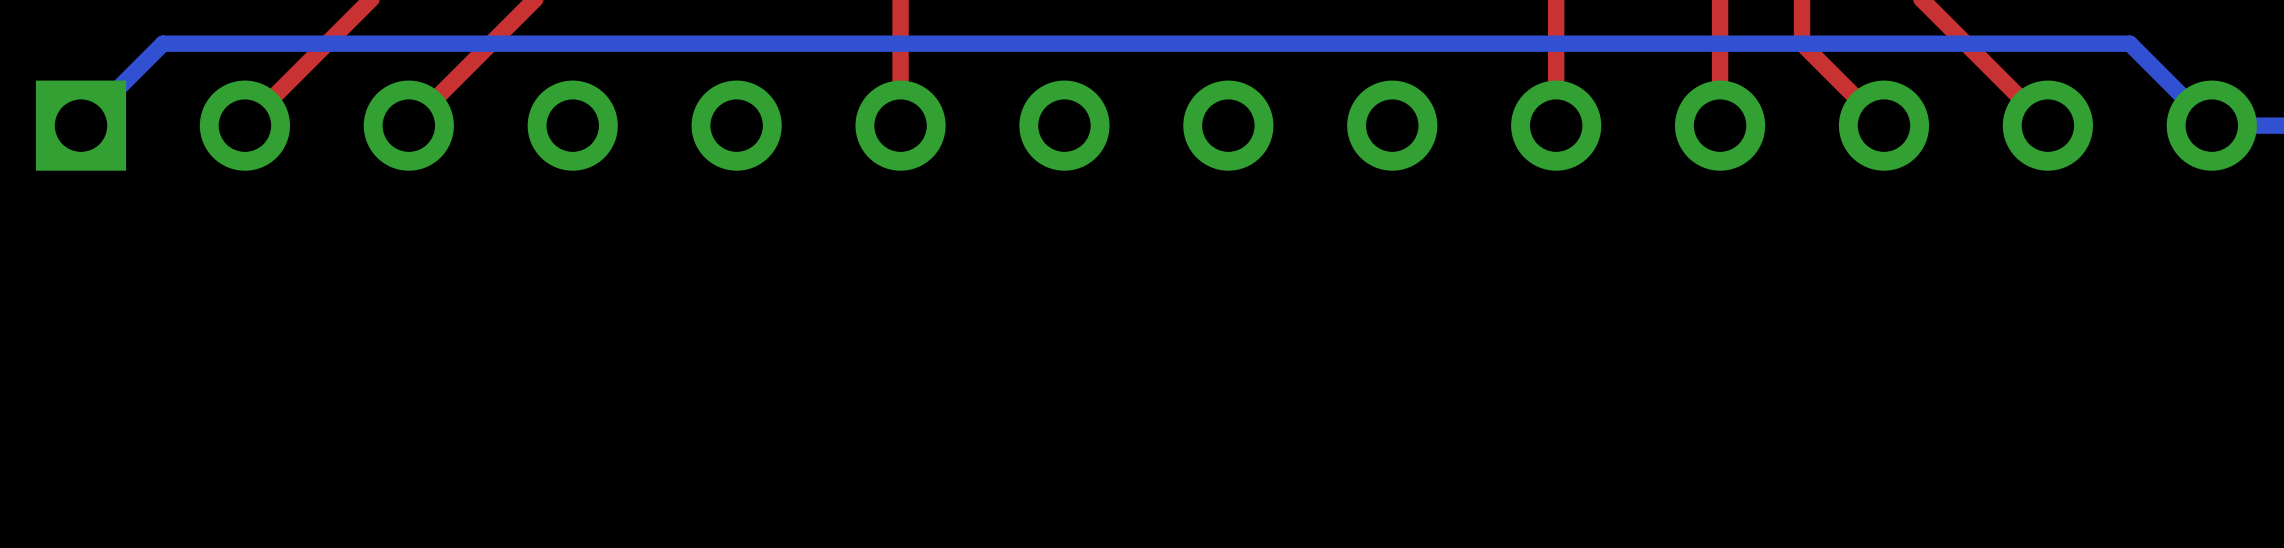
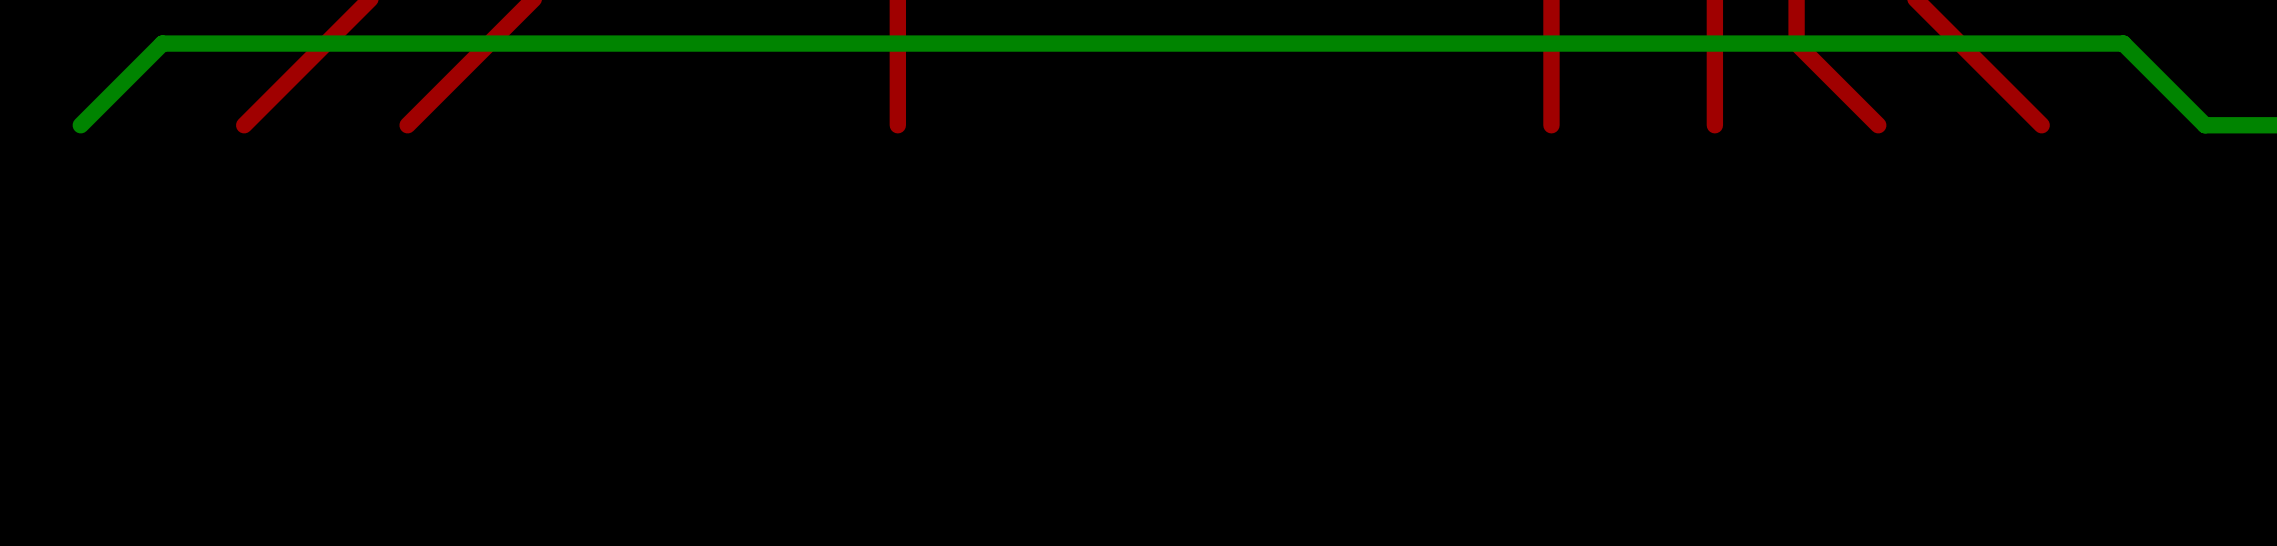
part: (1146, 125) -> none

